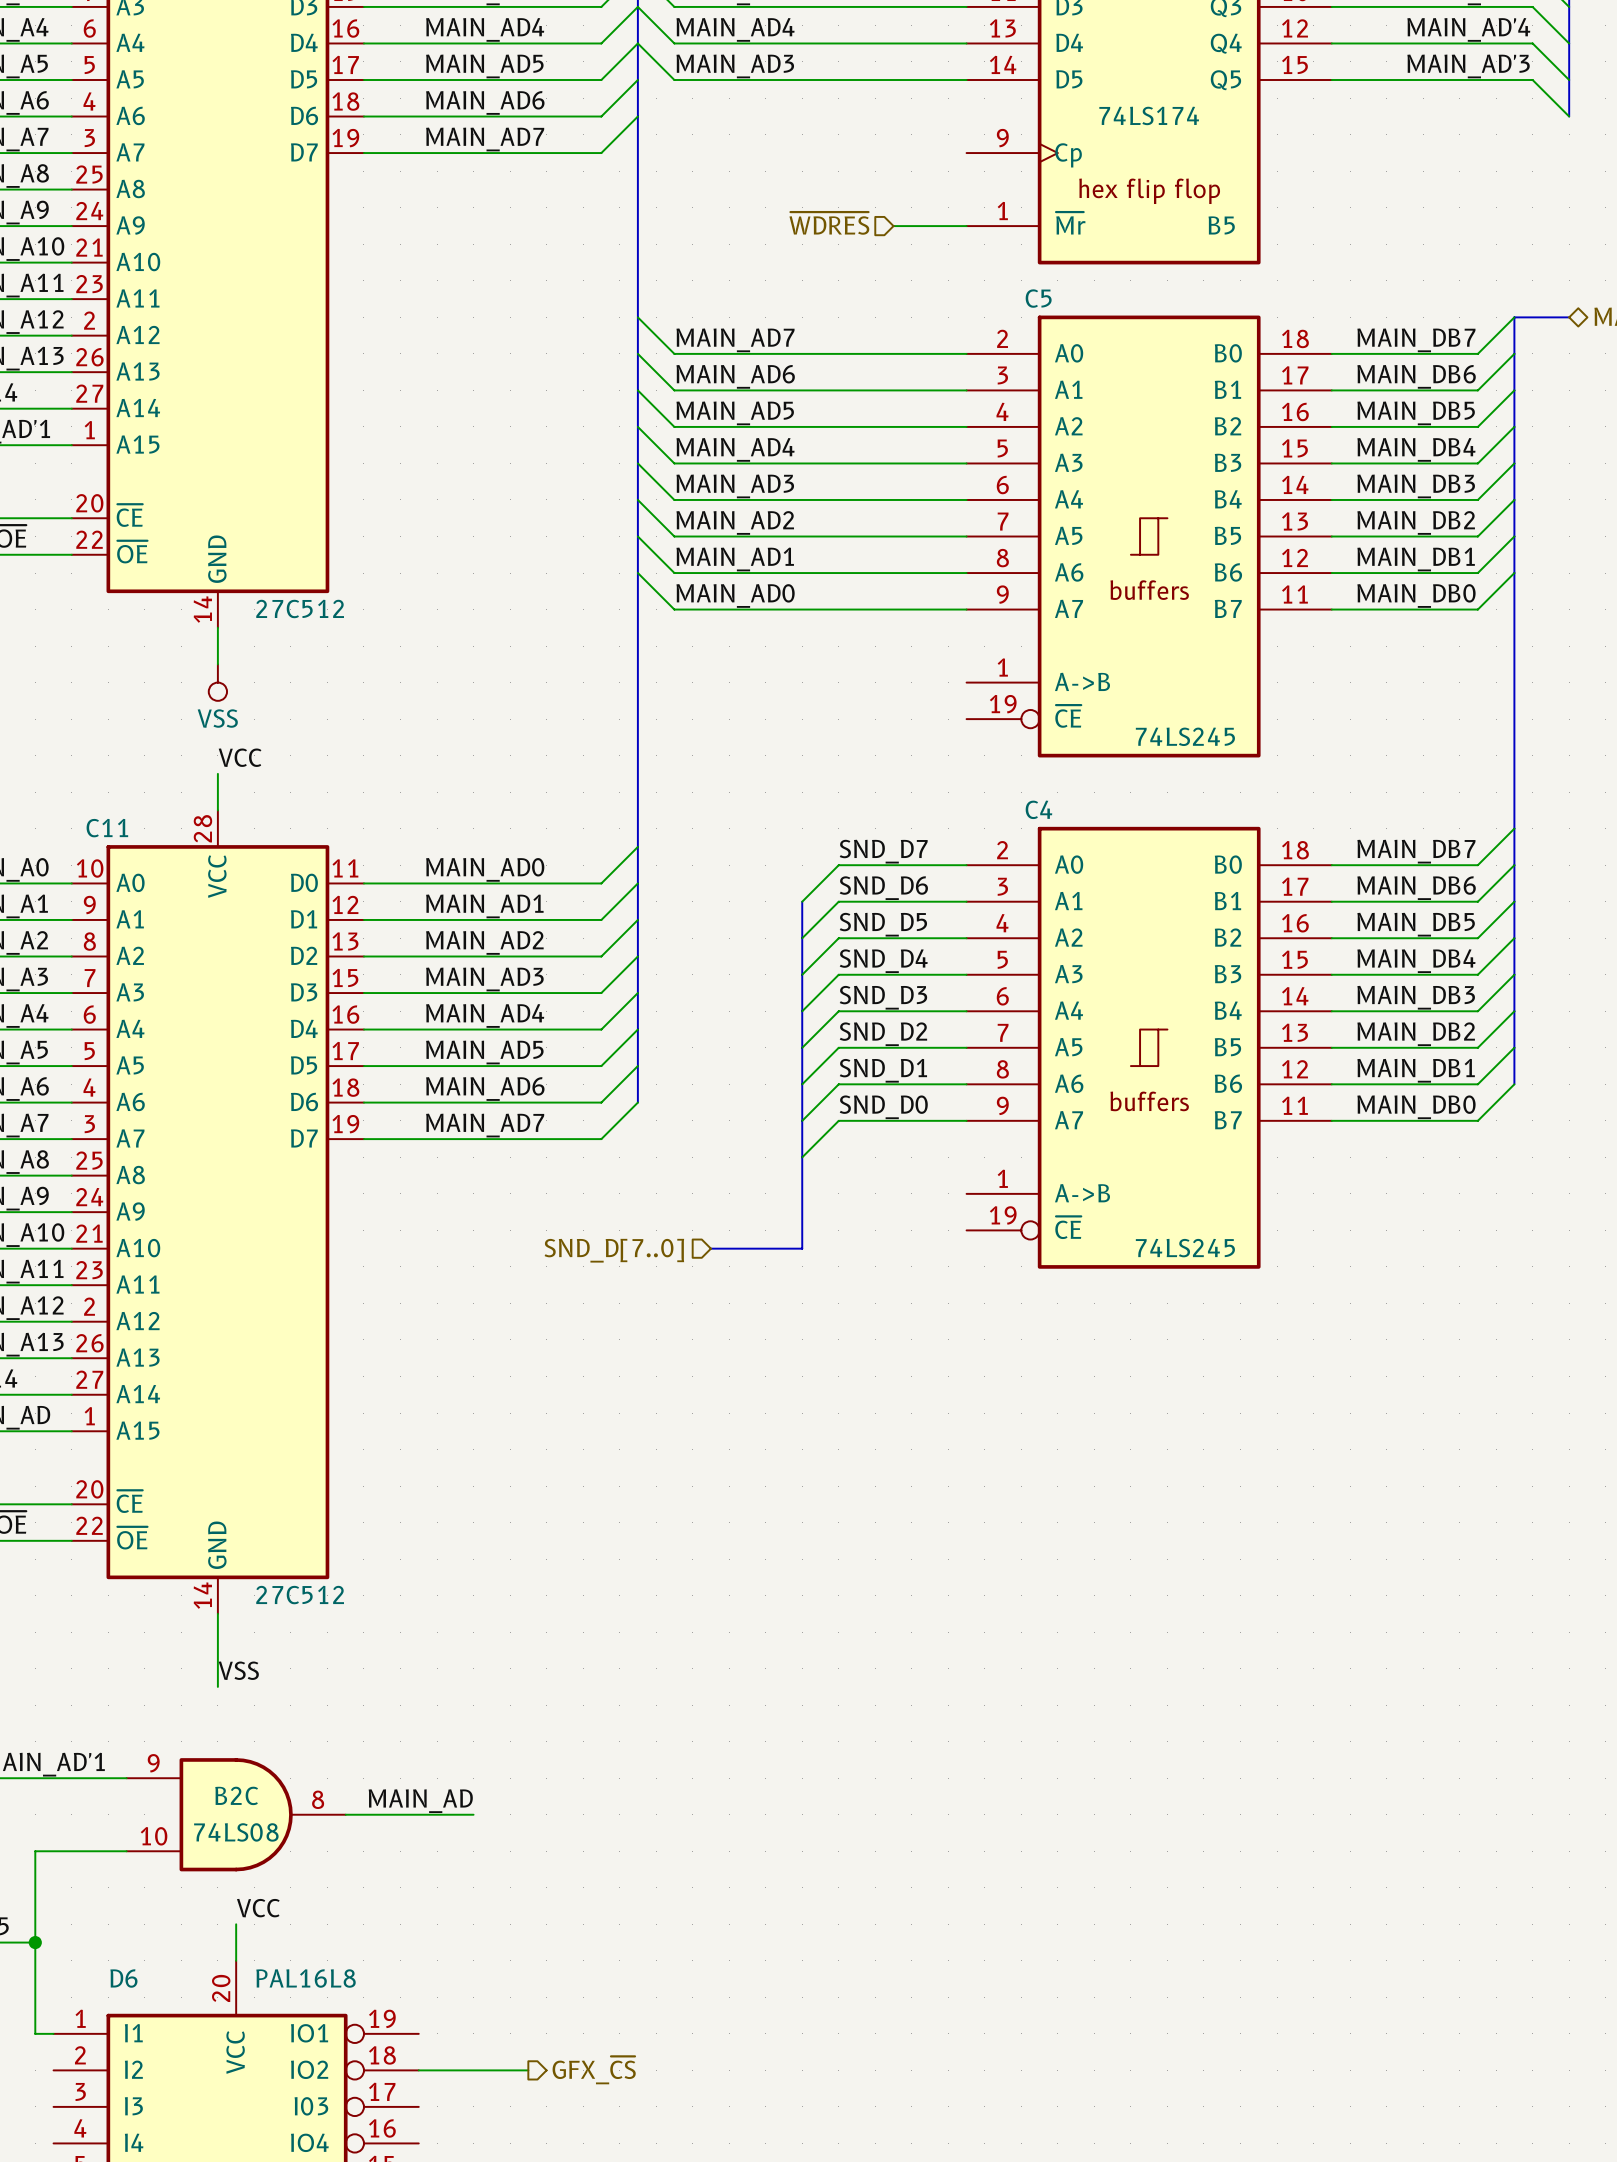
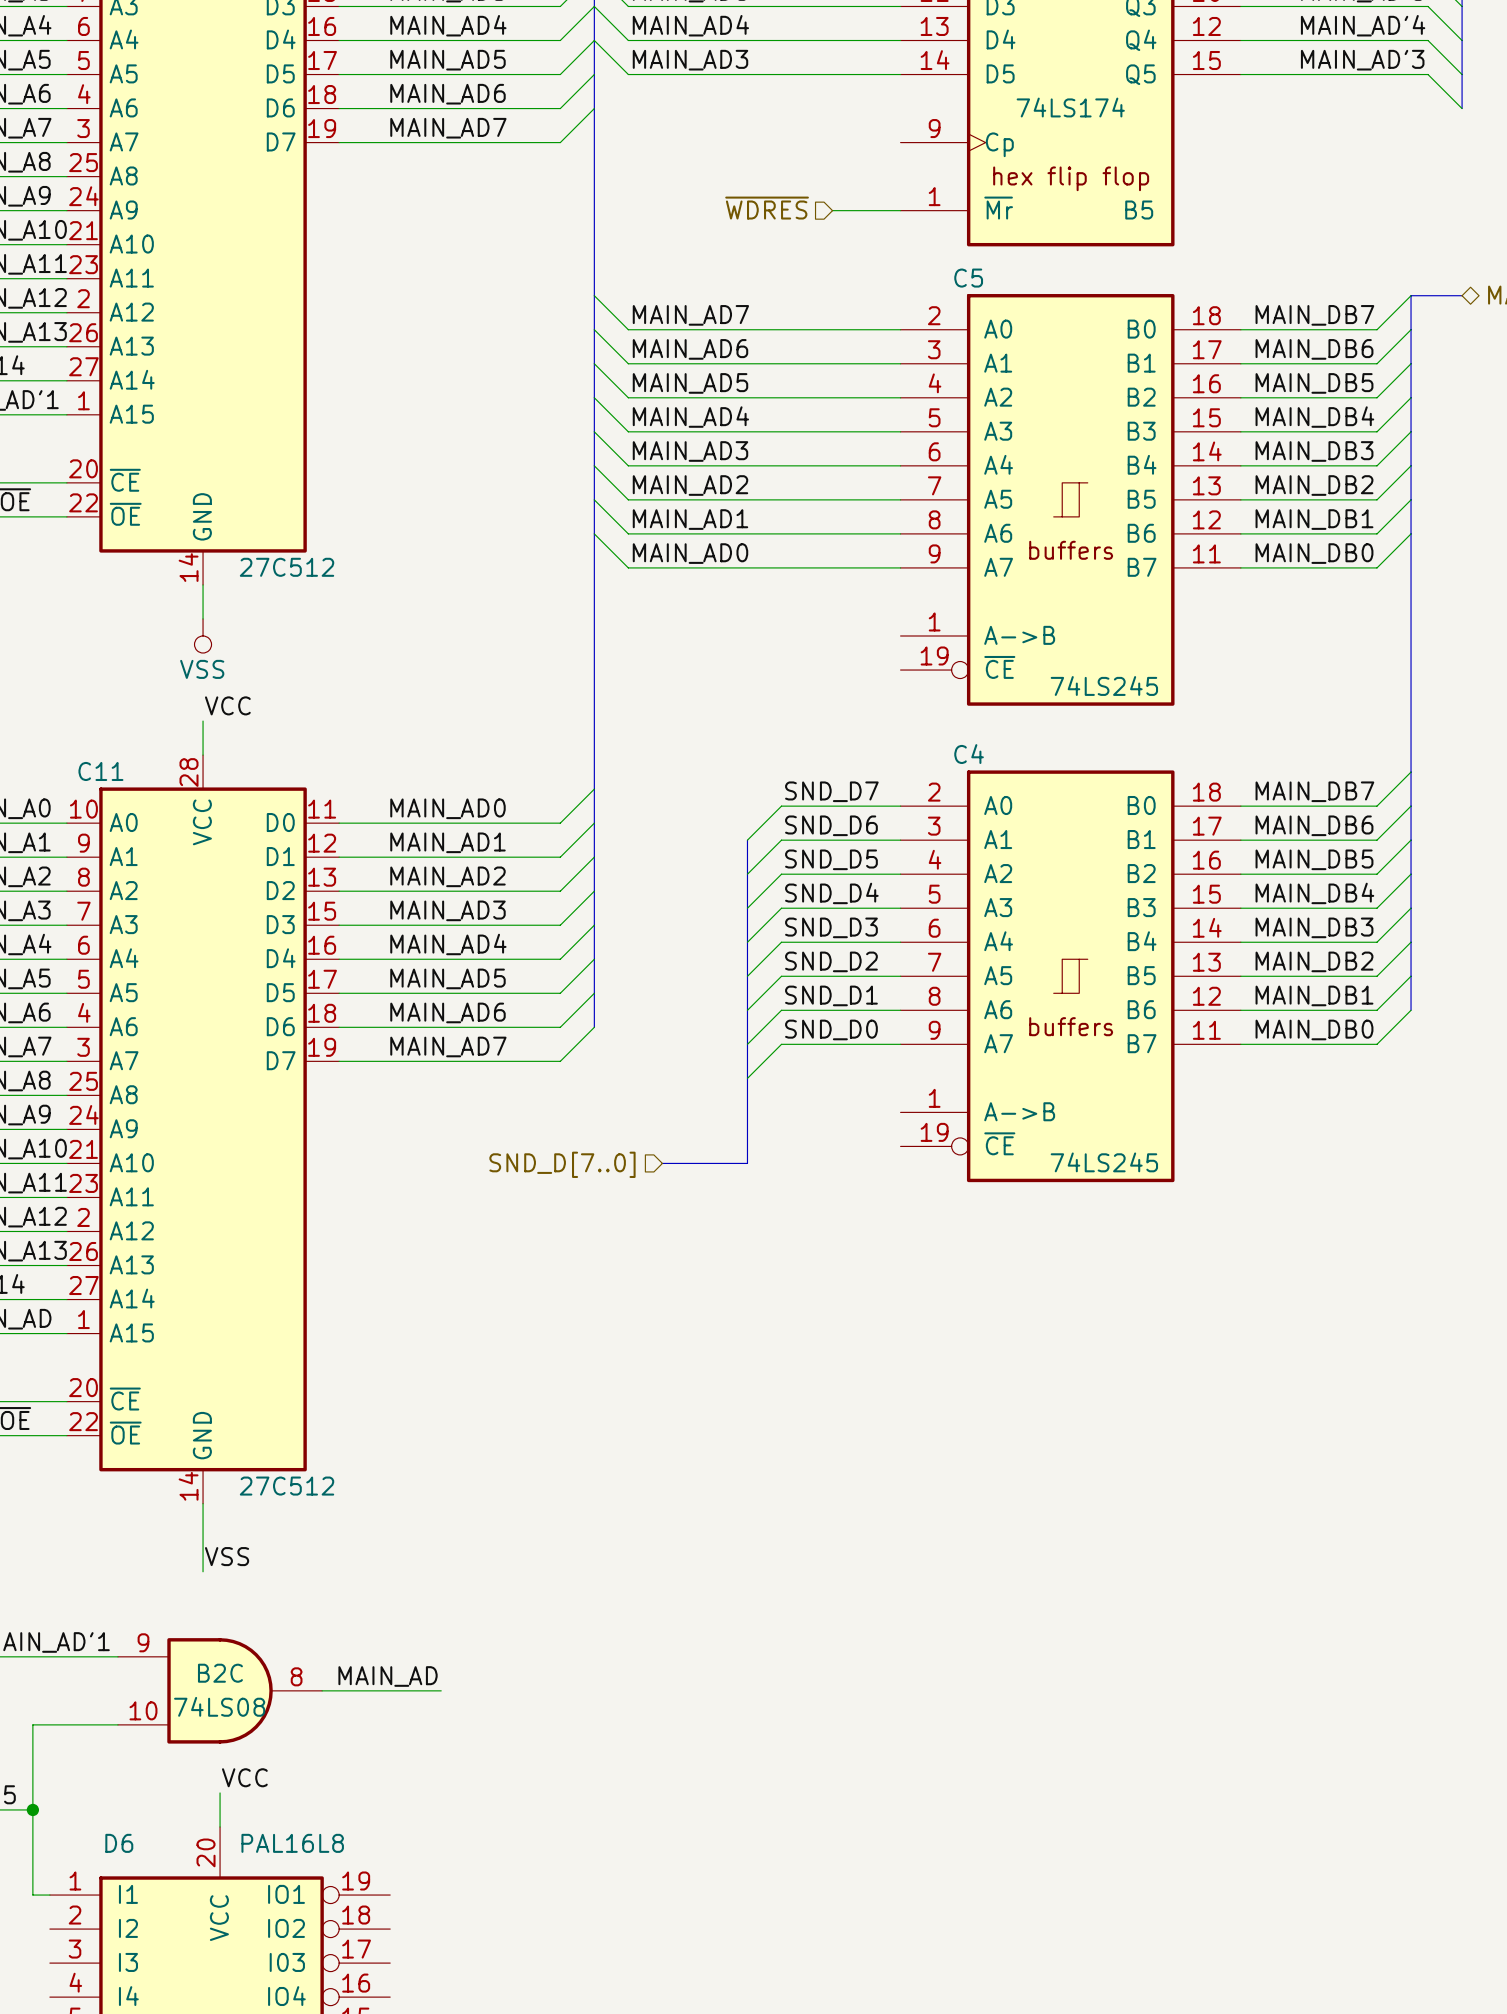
wire: (418, 2070) (528, 2070) -> none
hierarchical label: GFX_~{CS} (594, 2070) -> none

